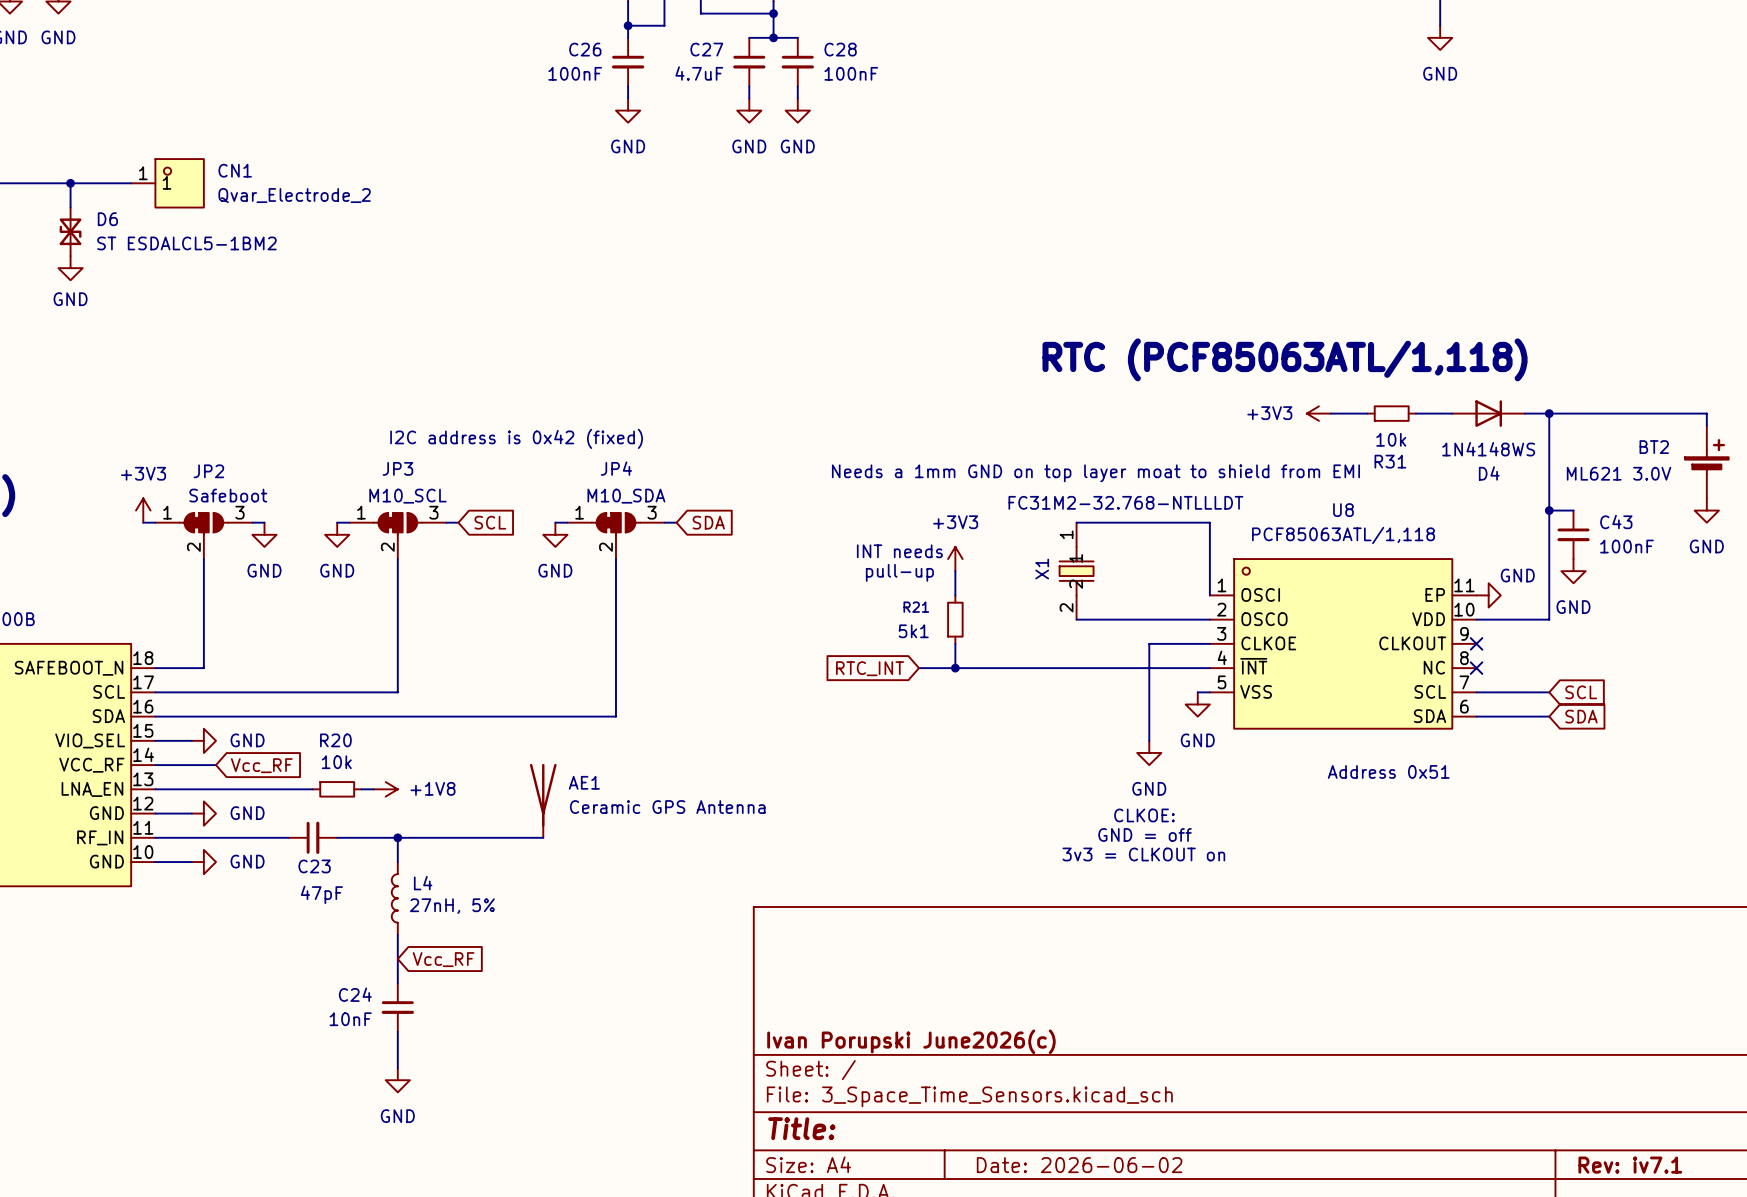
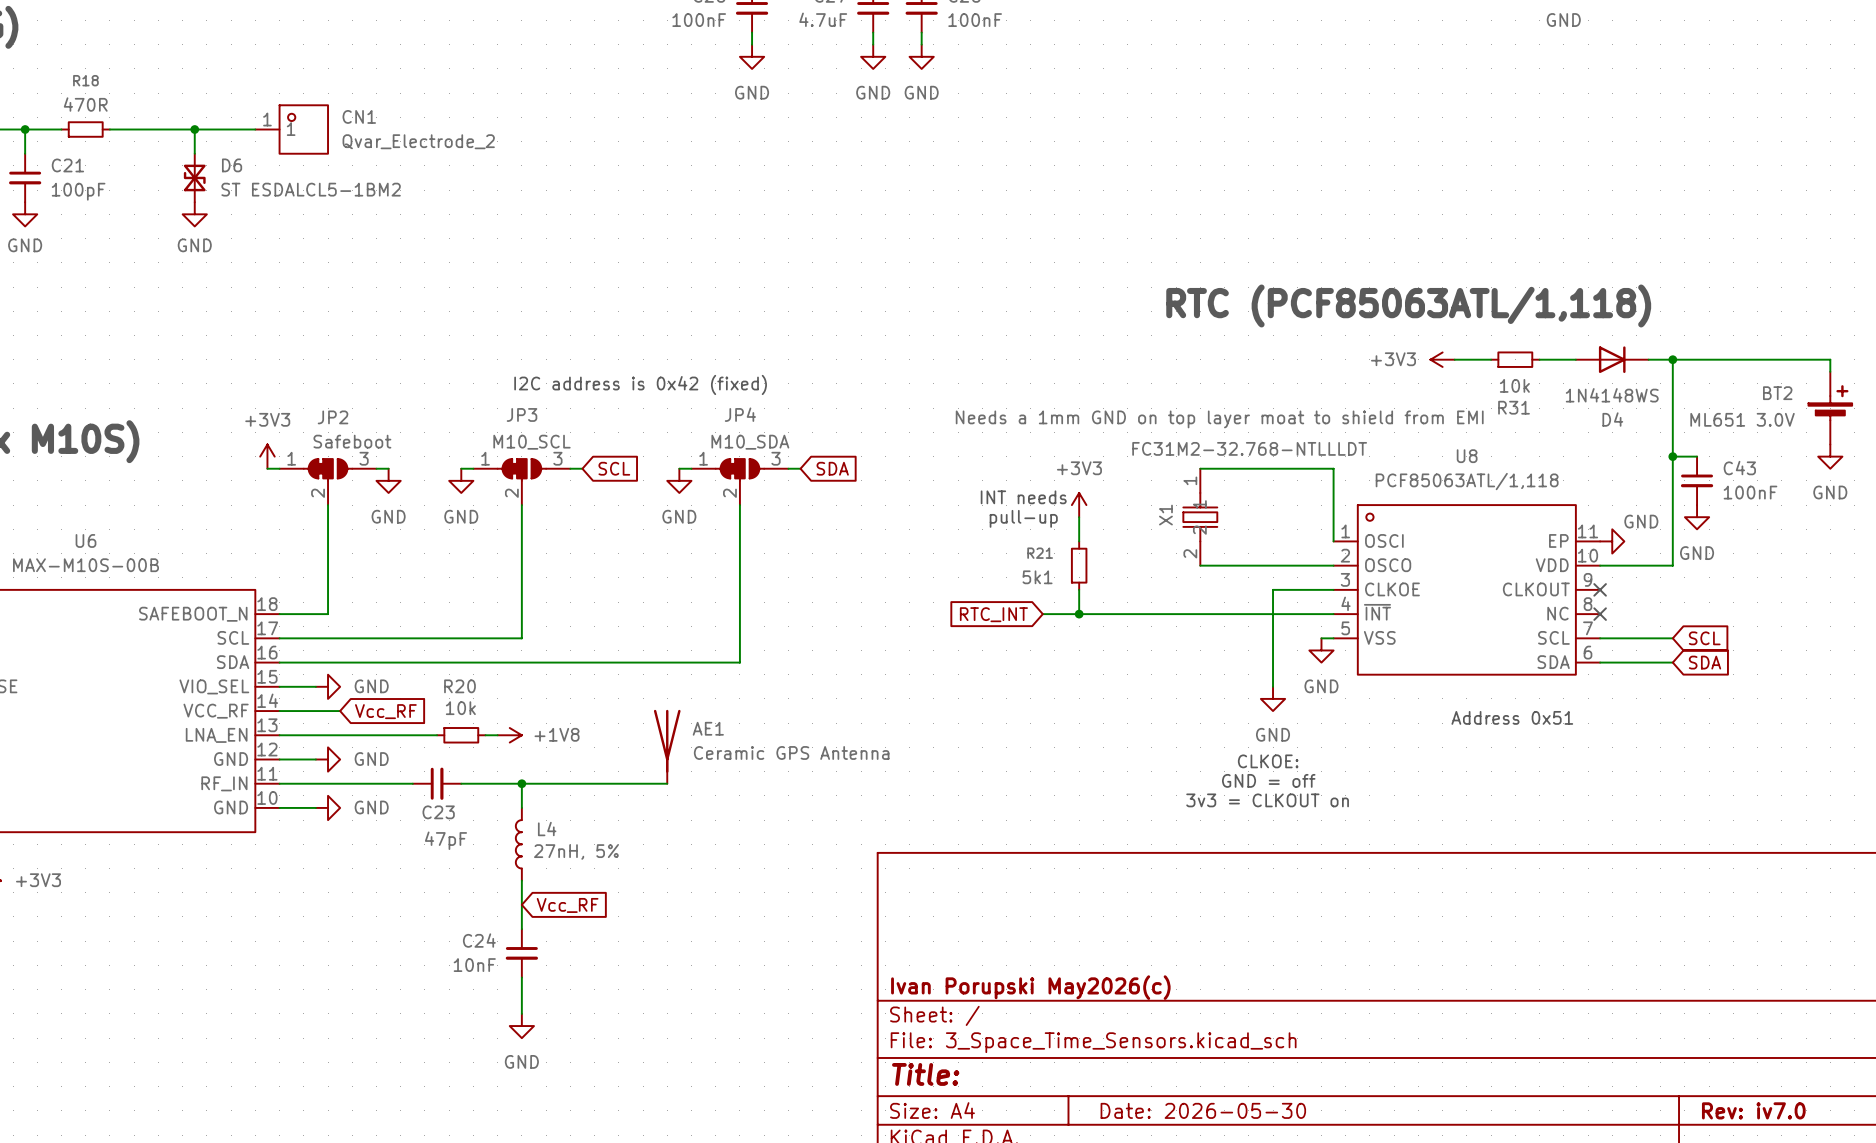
BT2 value: ML621 3.0V (1619, 473) -> ML651 3.0V (1742, 419)
title block: Ivan Porupski June2026(c) (911, 1041) -> Ivan Porupski May2026(c) (1030, 987)
title block: Date: 2026-06-02 (1079, 1165) -> Date: 2026-05-30 (1203, 1110)
title block: Rev: iv7.1 (1630, 1165) -> Rev: iv7.0 (1753, 1110)

